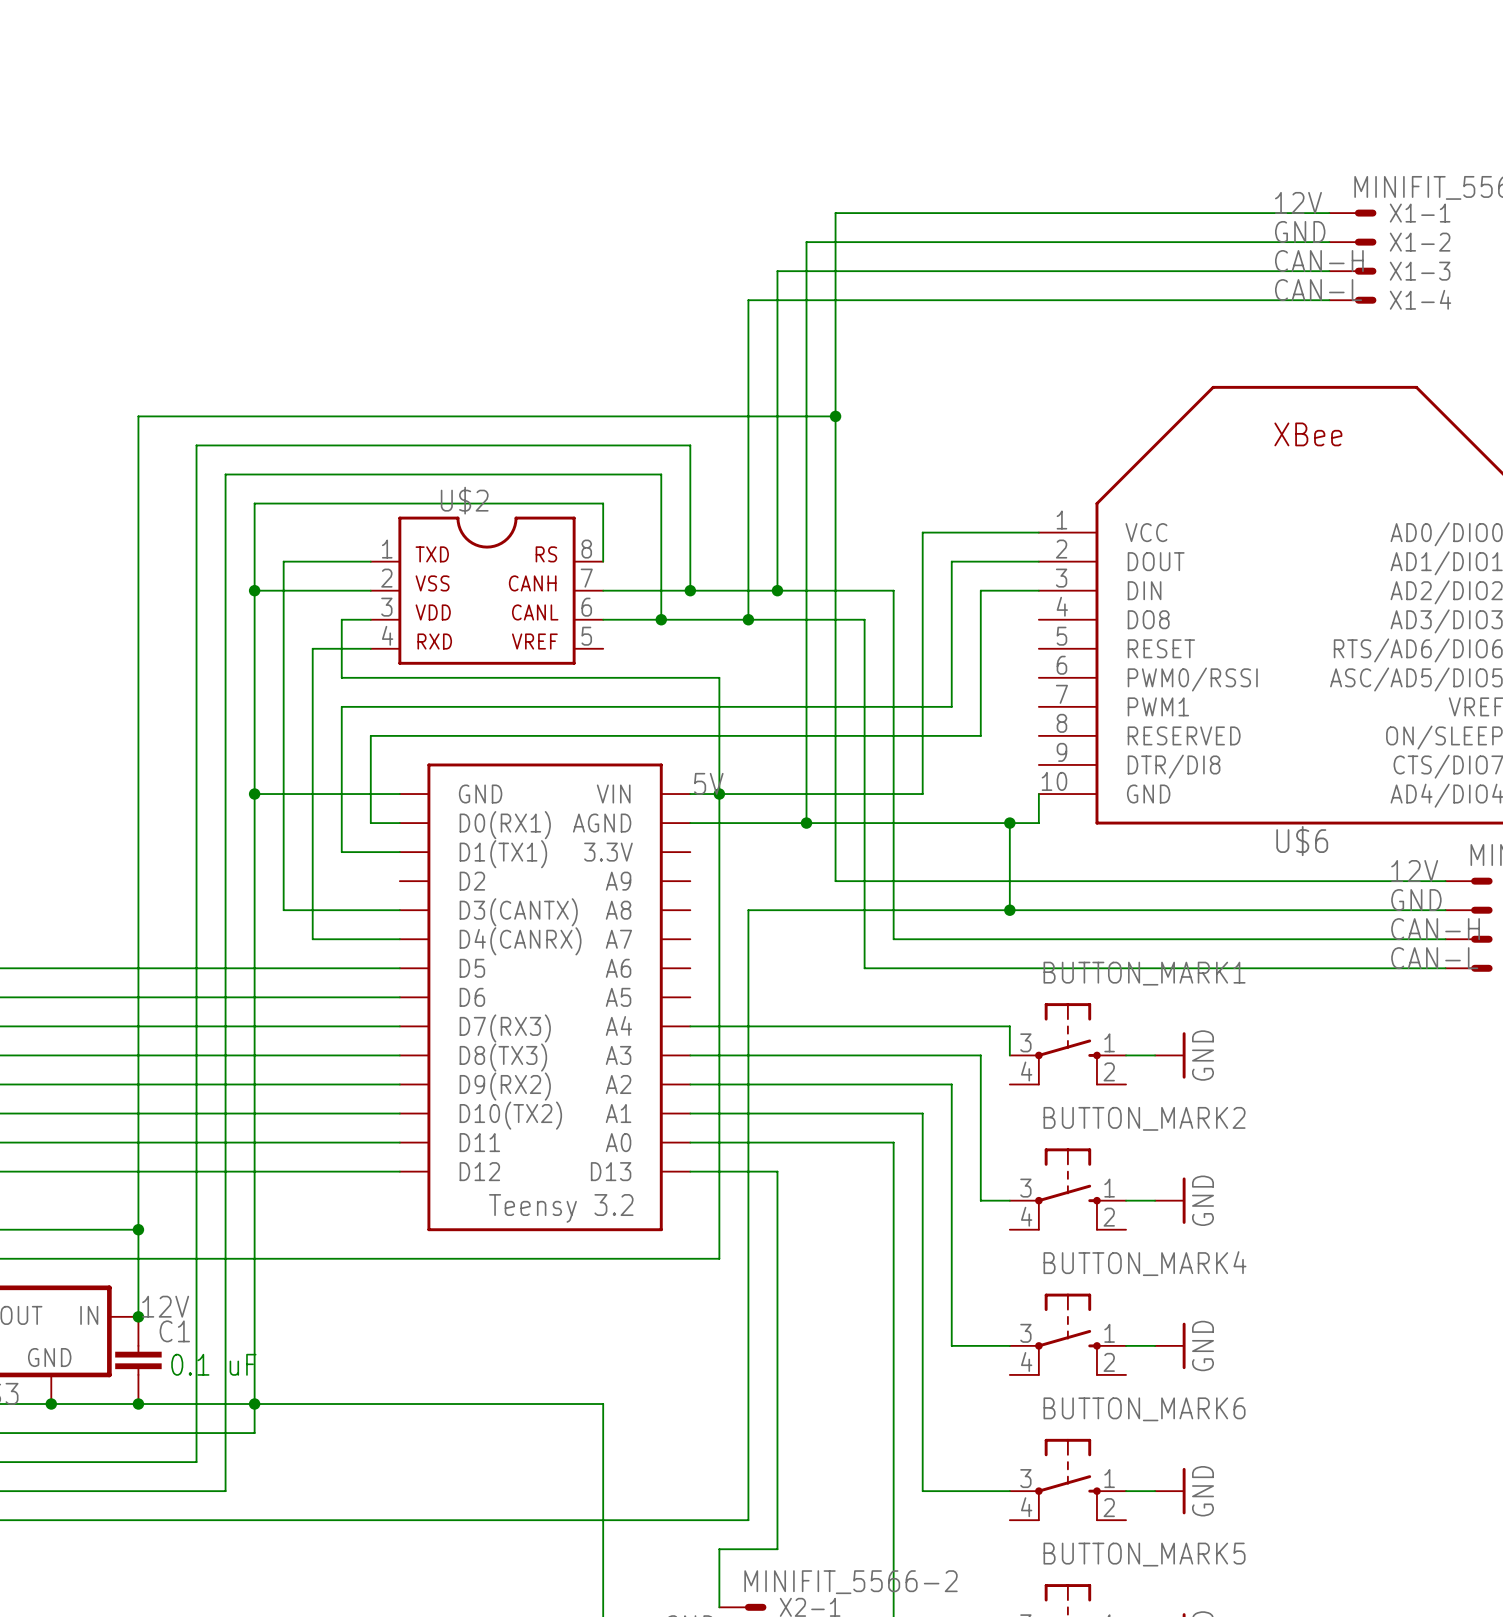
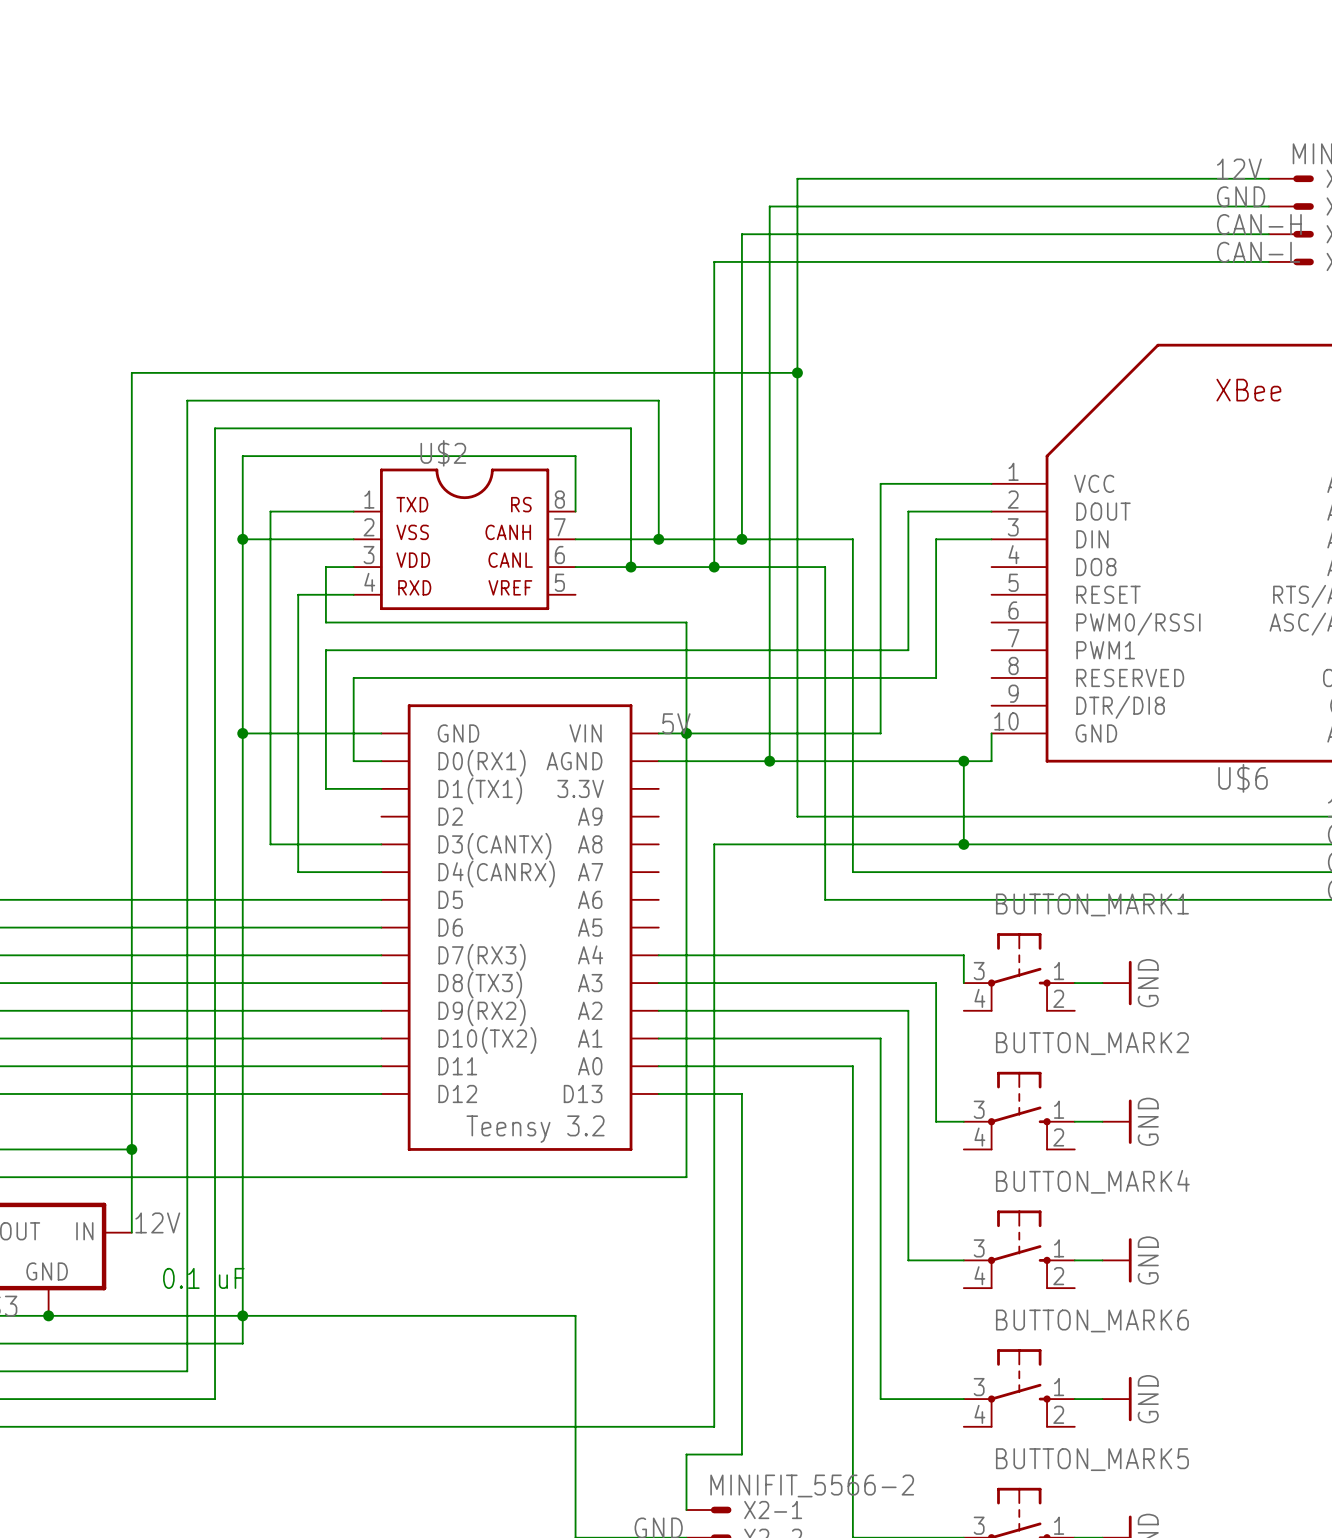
junction: (138, 1316) -> none
C1: (138, 1360) -> none
junction: (138, 1404) -> none

